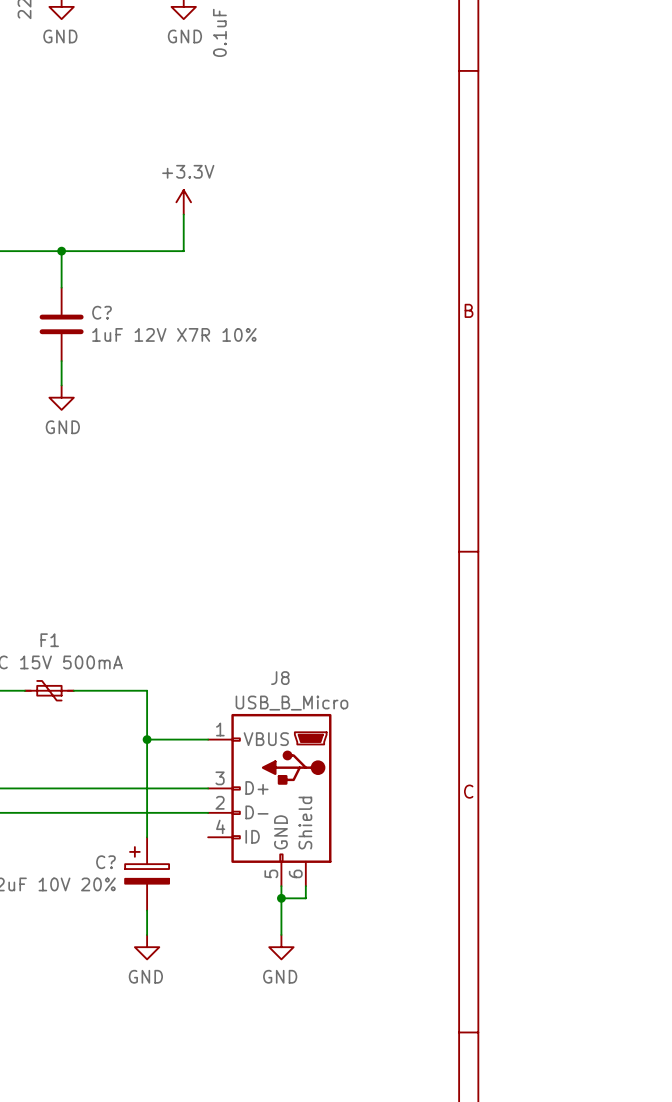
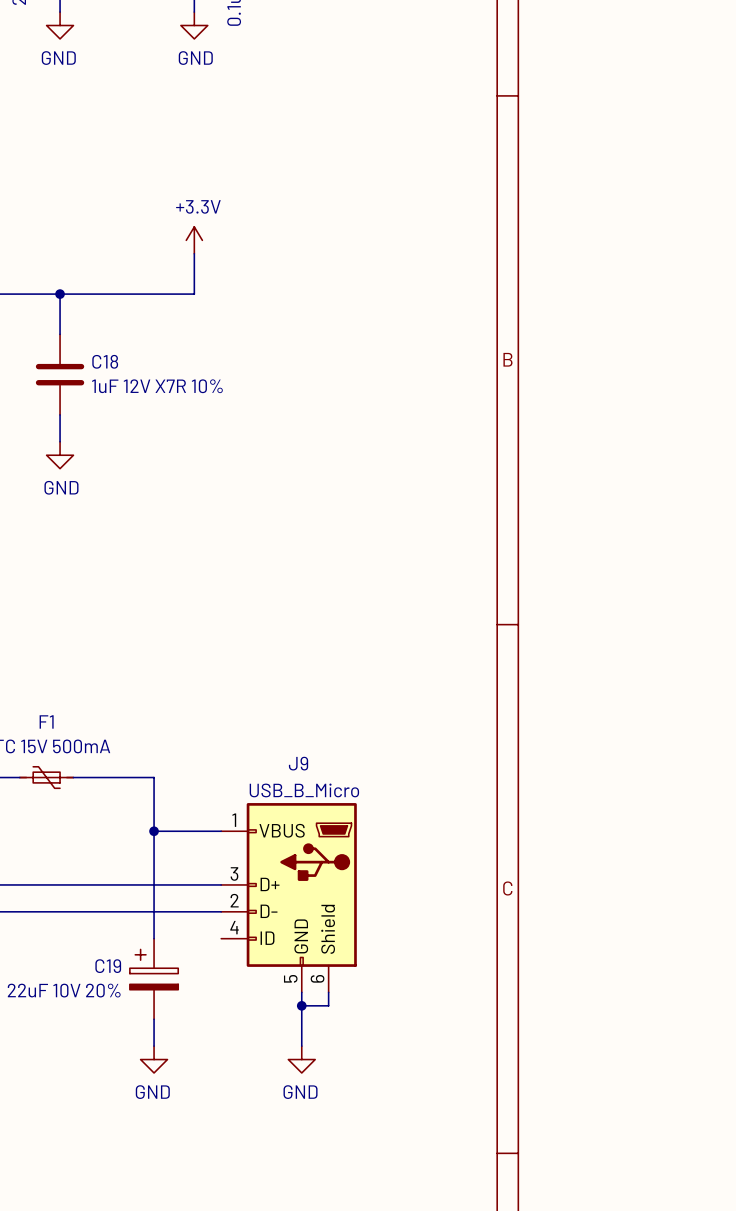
C? name: C? (102, 312) -> C18 (105, 361)
J8 name: J8 (280, 678) -> J9 (298, 763)
C? name: C? (105, 862) -> C19 (108, 966)

